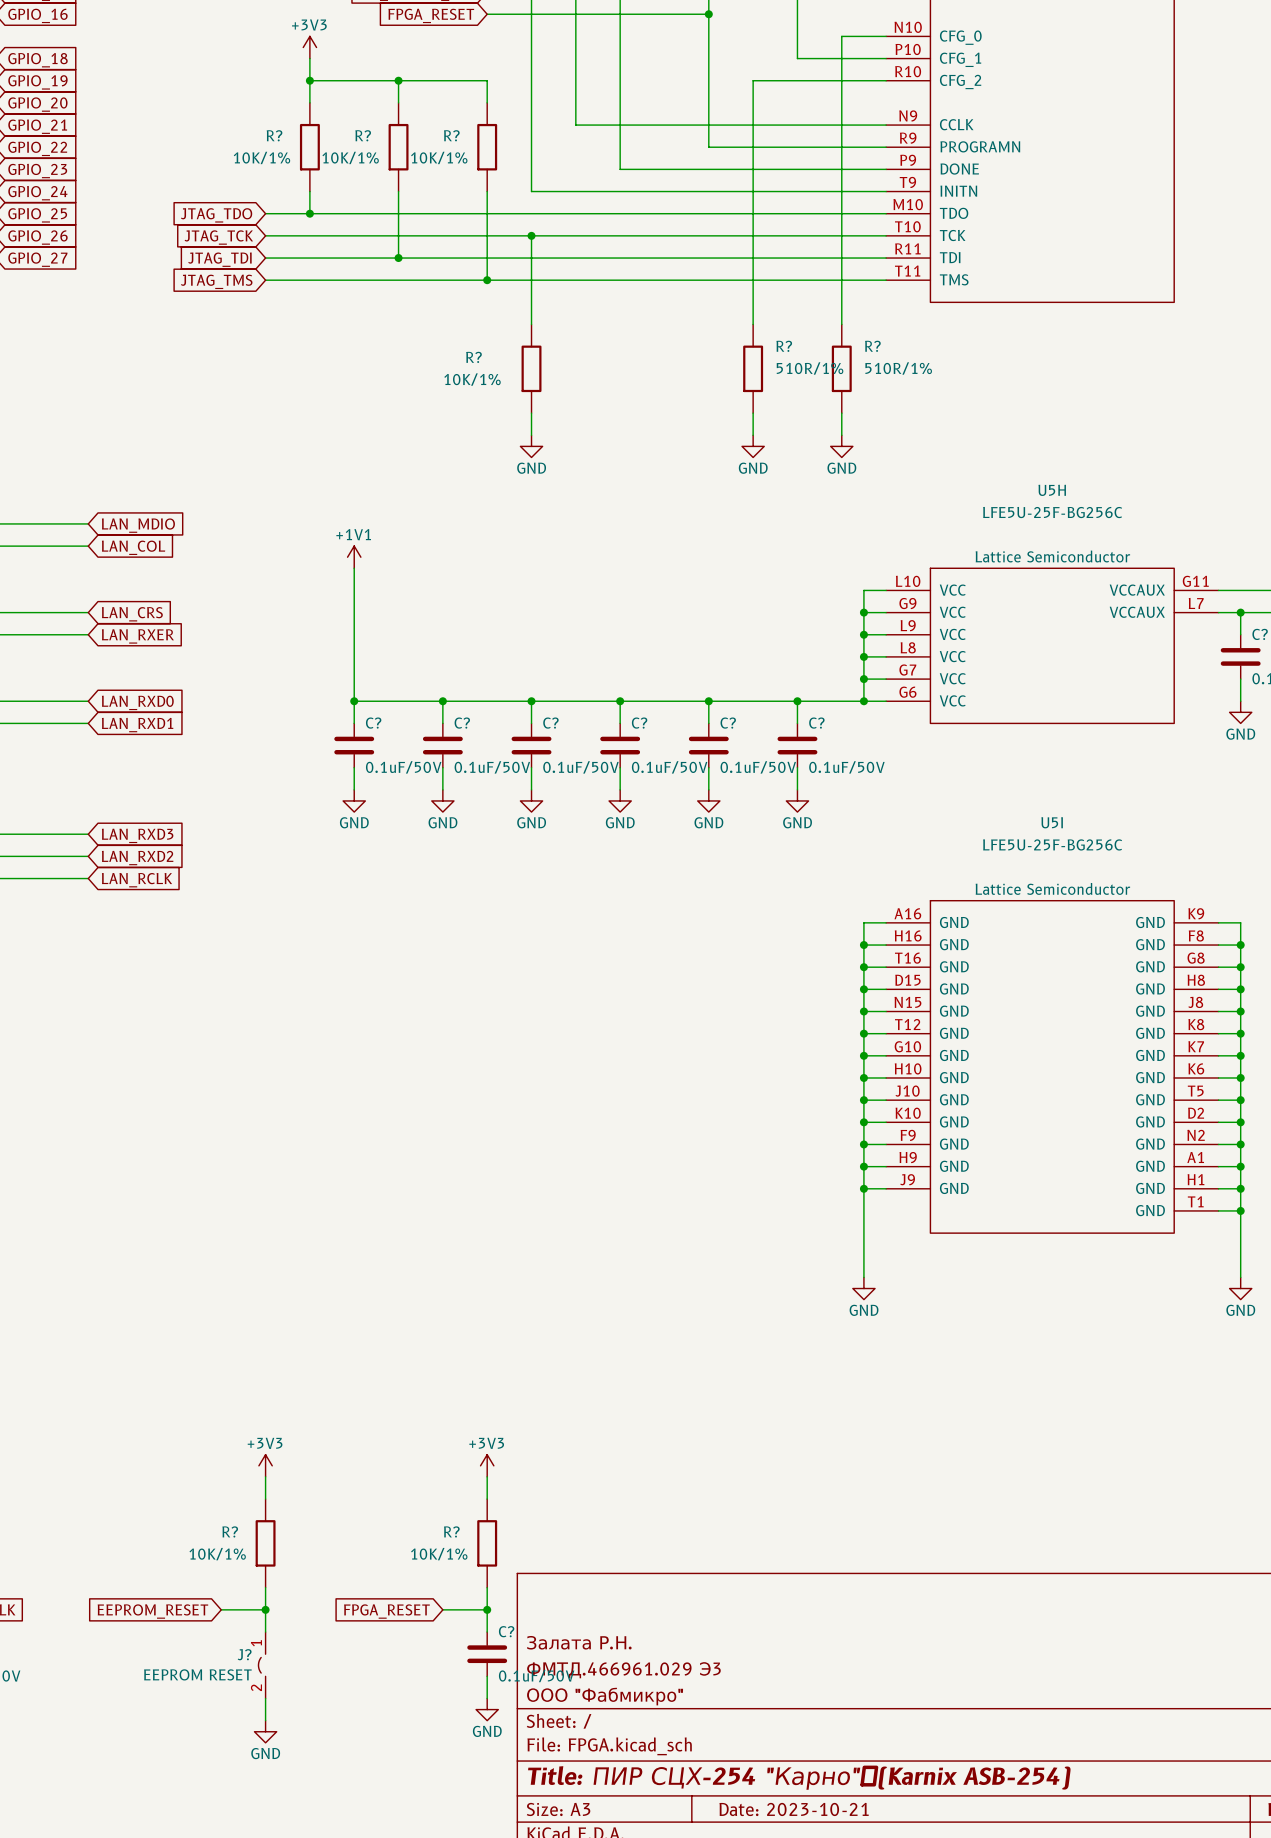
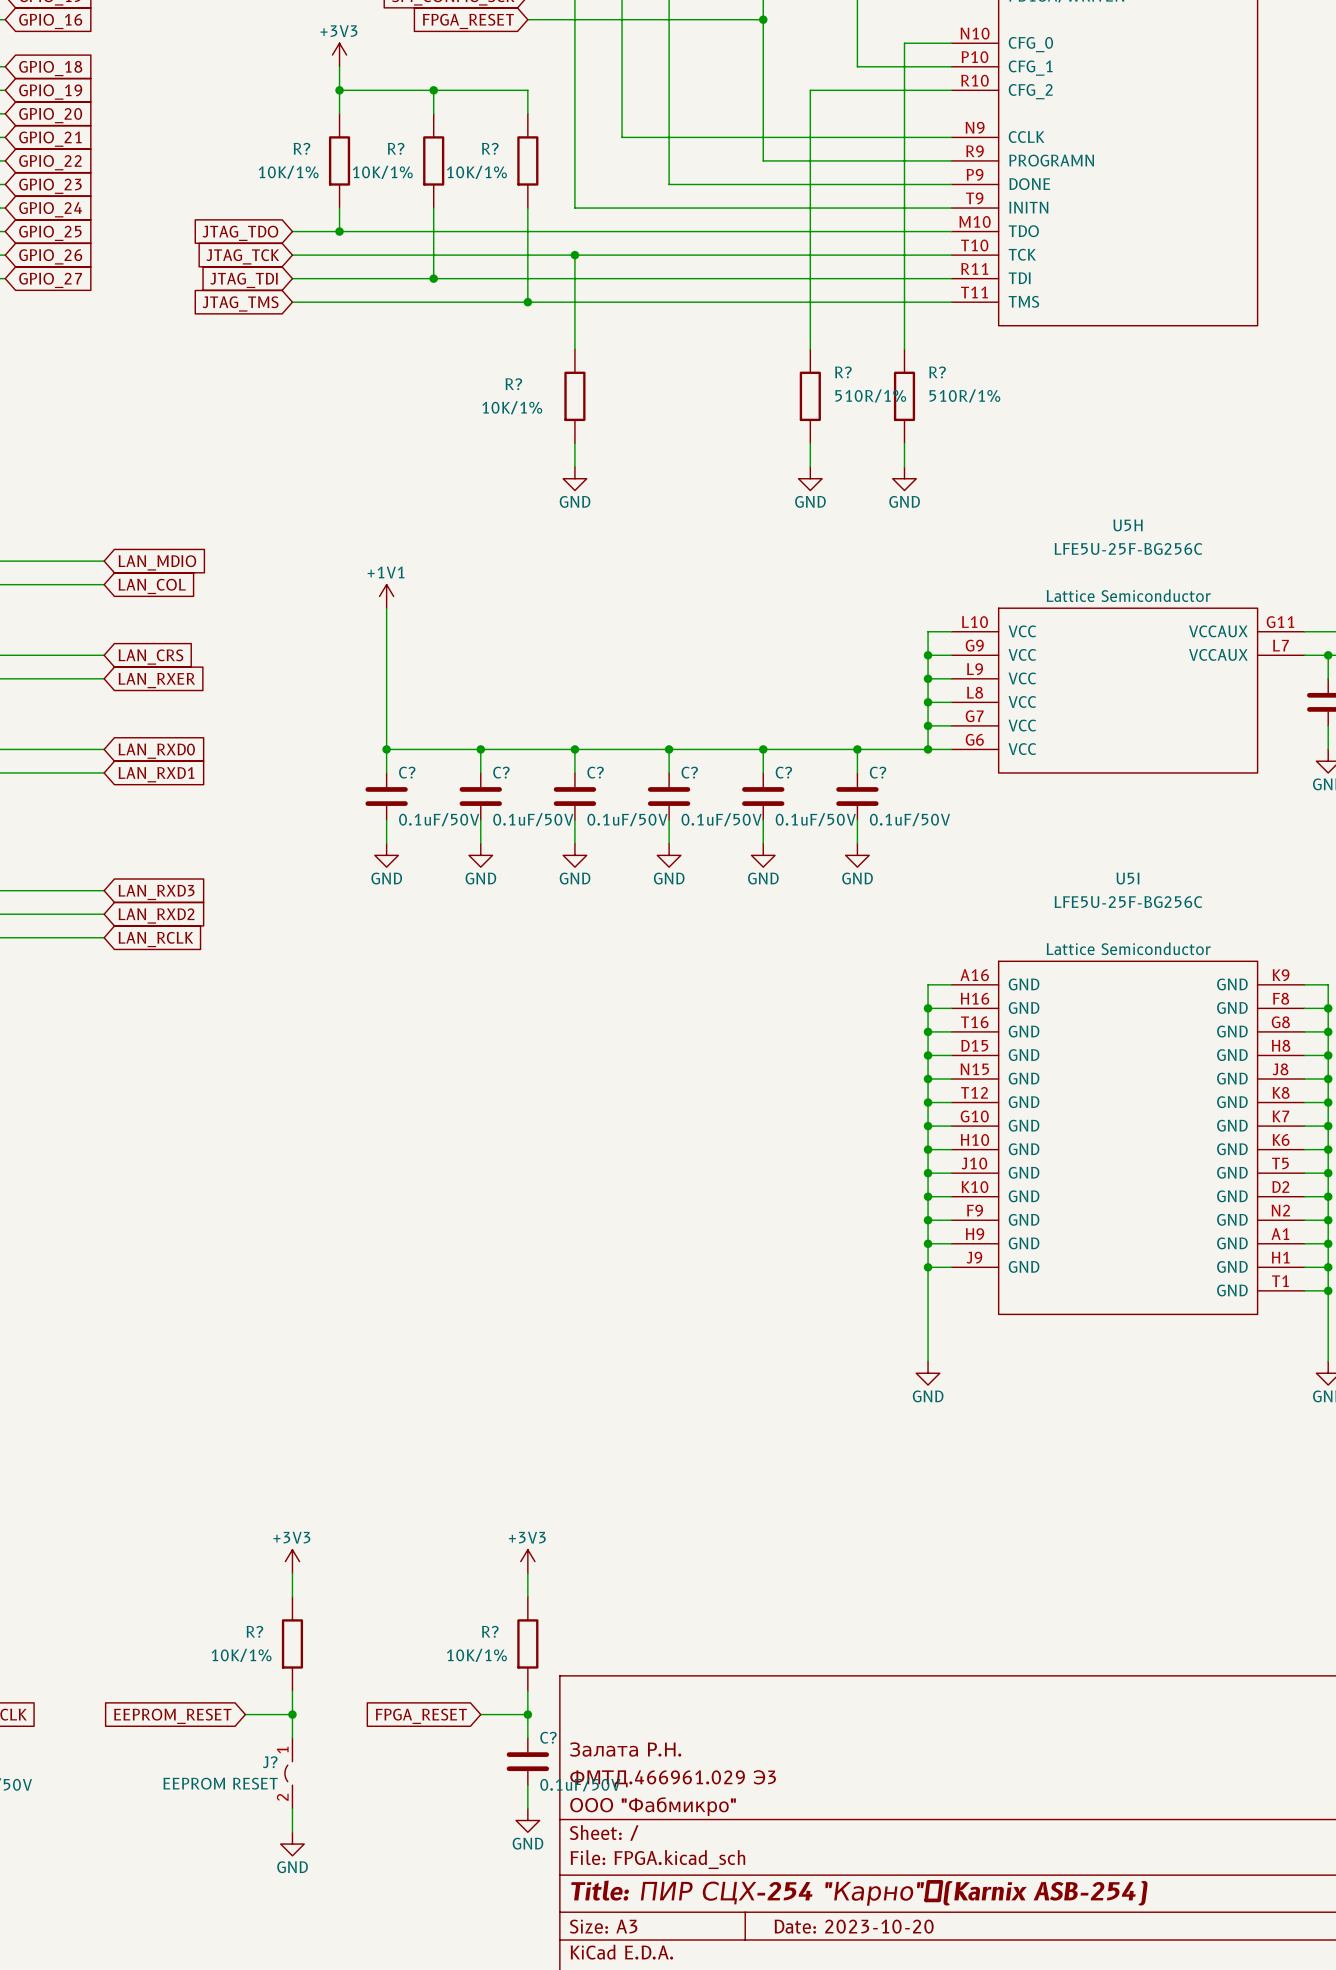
title block: Date: 2023-10-21 (794, 1809) -> Date: 2023-10-20 (854, 1926)

